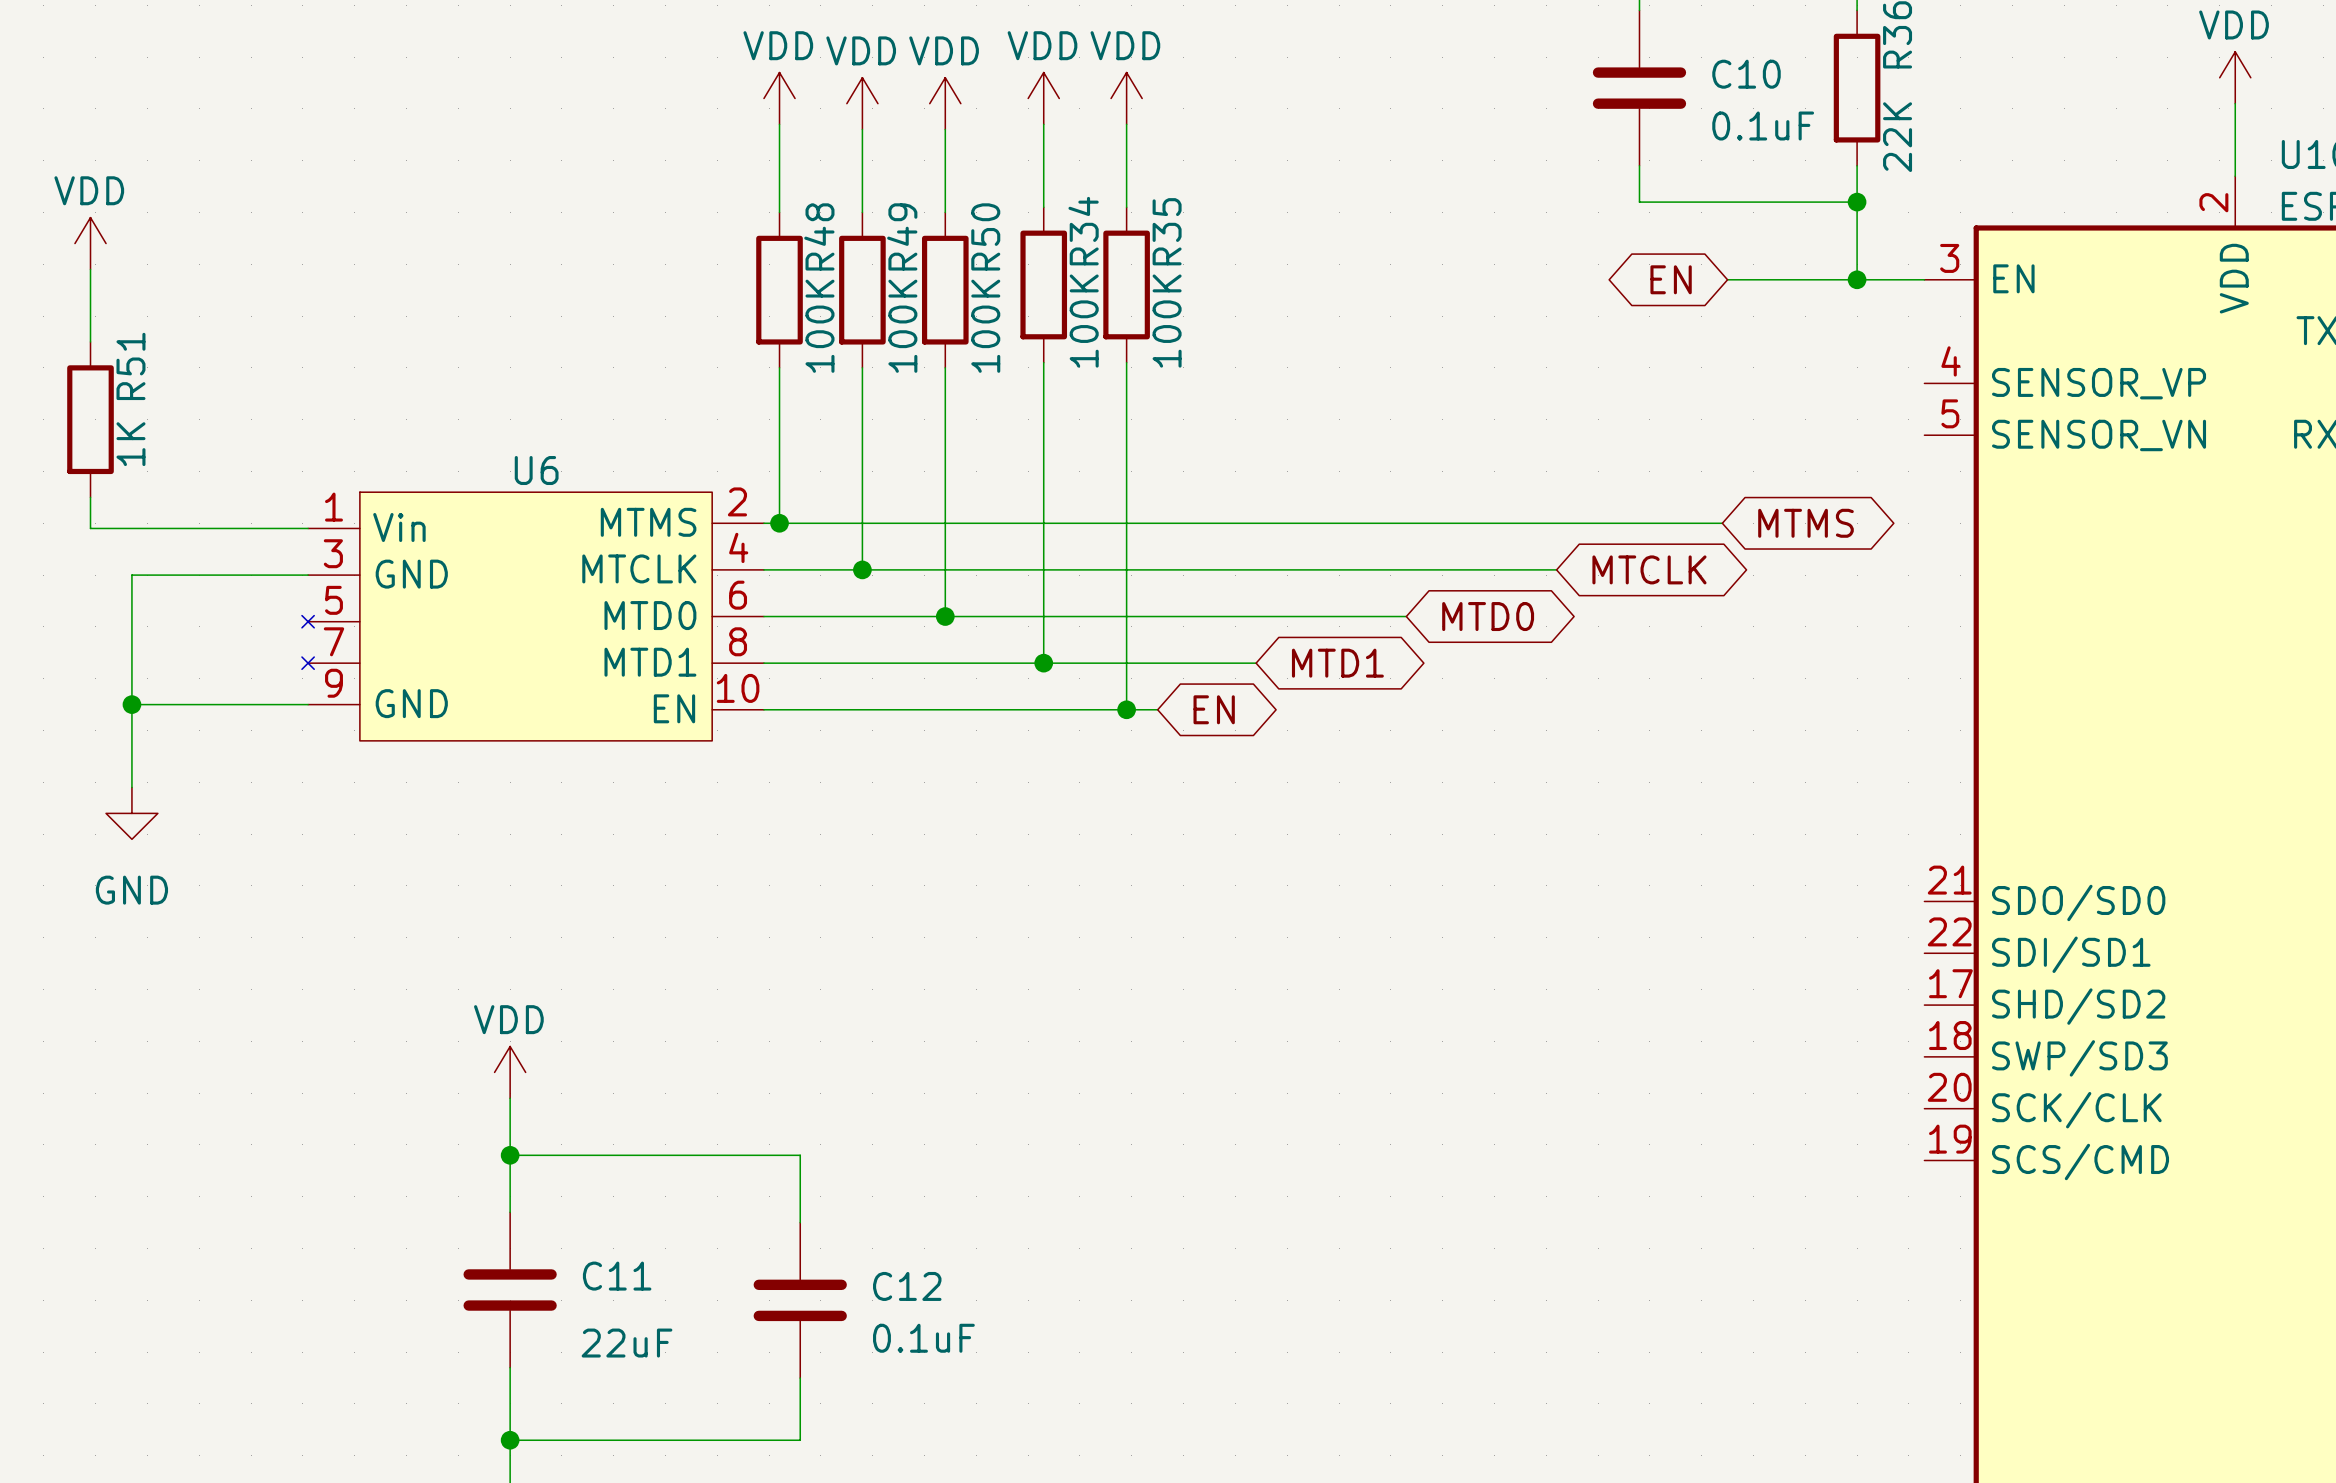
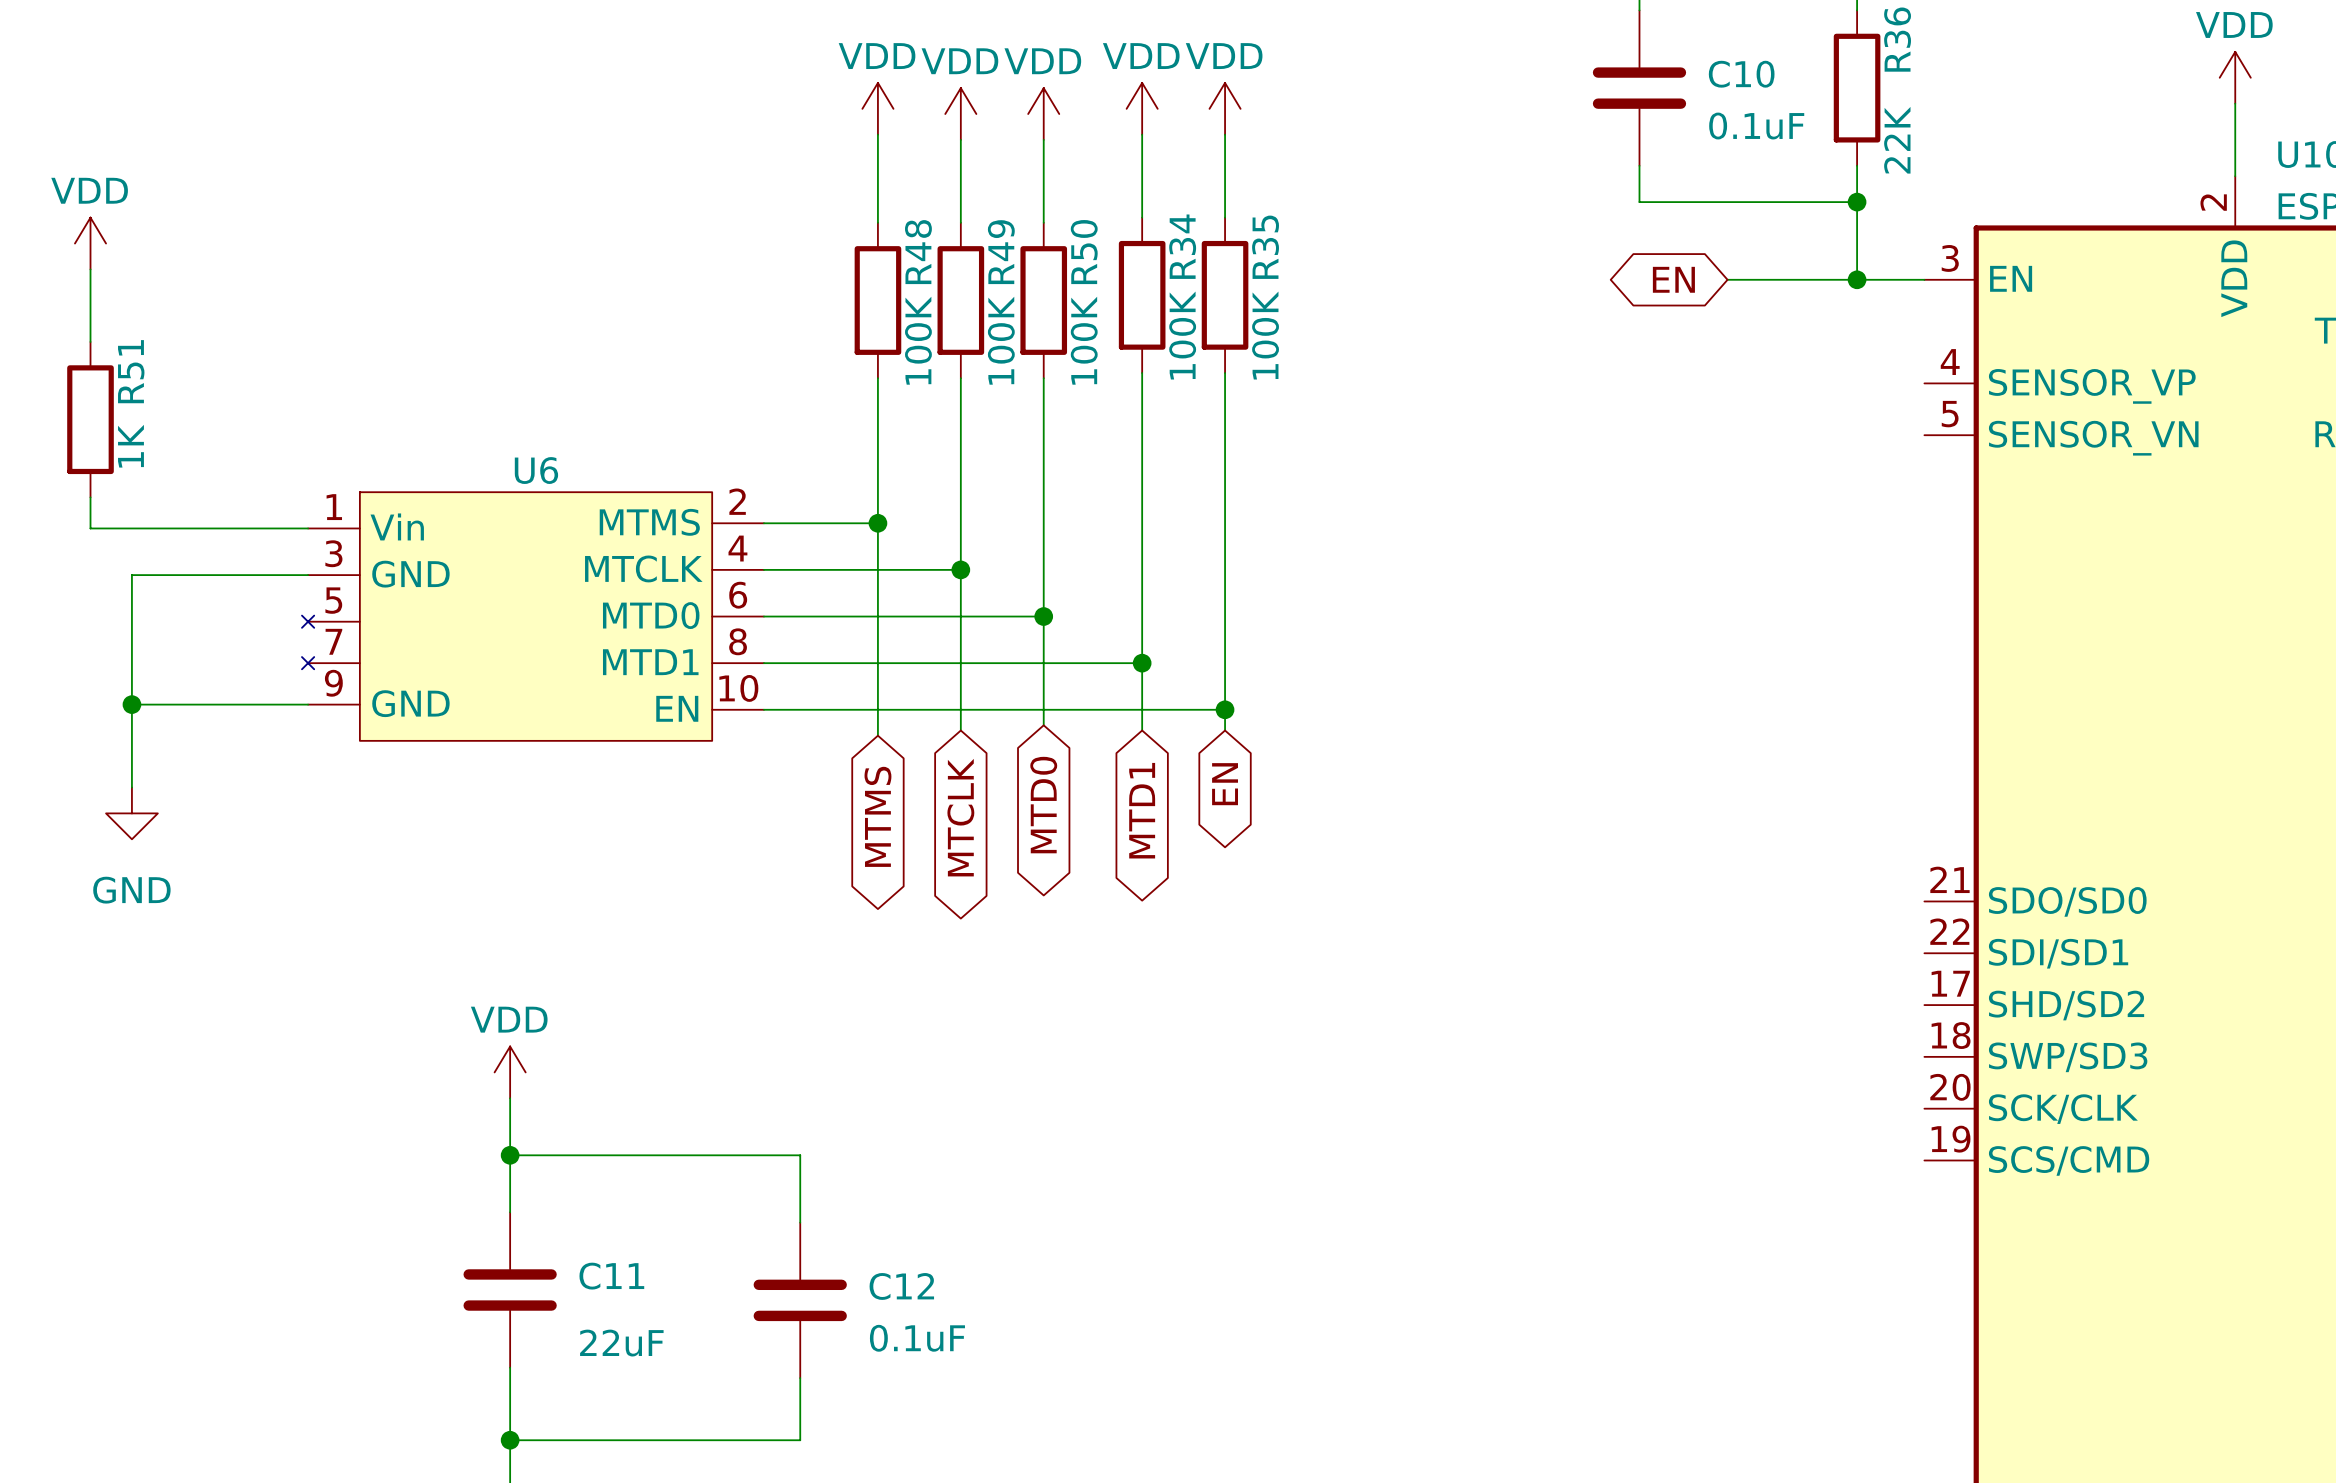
power symbol position: VDD (779, 98) -> VDD (1225, 108)
power symbol position: VDD (1043, 98) -> VDD (1043, 114)
power symbol position: VDD (1126, 98) -> VDD (1142, 108)
power symbol position: VDD (862, 103) -> VDD (877, 108)
power symbol position: VDD (945, 103) -> VDD (960, 114)
wire: (779, 124) (779, 212) -> (877, 134) (877, 222)
wire: (1126, 124) (1126, 207) -> (1225, 134) (1225, 217)
wire: (862, 129) (862, 212) -> (960, 139) (960, 222)
wire: (945, 129) (945, 212) -> (1142, 134) (1142, 217)
R34 position: (1043, 284) -> (1142, 295)
R35 position: (1126, 284) -> (1225, 295)
R48 position: (779, 290) -> (877, 300)
R49 position: (862, 290) -> (960, 300)
R50 position: (945, 290) -> (1043, 300)
wire: (1126, 362) (1126, 709) -> none
wire: (779, 367) (779, 523) -> none
wire: (862, 367) (862, 569) -> none
wire: (945, 367) (945, 616) -> none
wire: none -> (1142, 373) (1142, 730)
wire: none -> (1225, 373) (1225, 730)
wire: none -> (877, 378) (877, 735)
wire: none -> (960, 378) (960, 730)
junction: (779, 523) -> none
wire: (877, 523) (1722, 523) -> none
junction: none -> (877, 523)
global label: MTMS (1805, 523) -> none
junction: (862, 569) -> none
wire: (960, 569) (1556, 569) -> none
junction: none -> (960, 569)
global label: MTCLK (1649, 569) -> none
junction: (945, 616) -> none
wire: (1043, 616) (1406, 616) -> none
global label rotation: 0° (1488, 616) -> 90° clockwise (1043, 805)
global label position: MTD0 (1488, 616) -> MTD0 (1043, 805)
wire: none -> (1043, 663) (1043, 725)
junction position: (1043, 663) -> (1043, 616)
wire: (1142, 663) (1256, 663) -> none
junction: none -> (1142, 663)
global label rotation: 0° (1337, 663) -> 90° clockwise (1142, 810)
global label position: MTD1 (1337, 663) -> MTD1 (1142, 810)
junction: (1126, 709) -> none
wire: none -> (1157, 709) (1225, 709)
global label rotation: 0° (1214, 709) -> 90° clockwise (1225, 784)
junction: none -> (1225, 709)
global label: none -> MTMS (877, 816)
global label: none -> MTCLK (960, 817)

